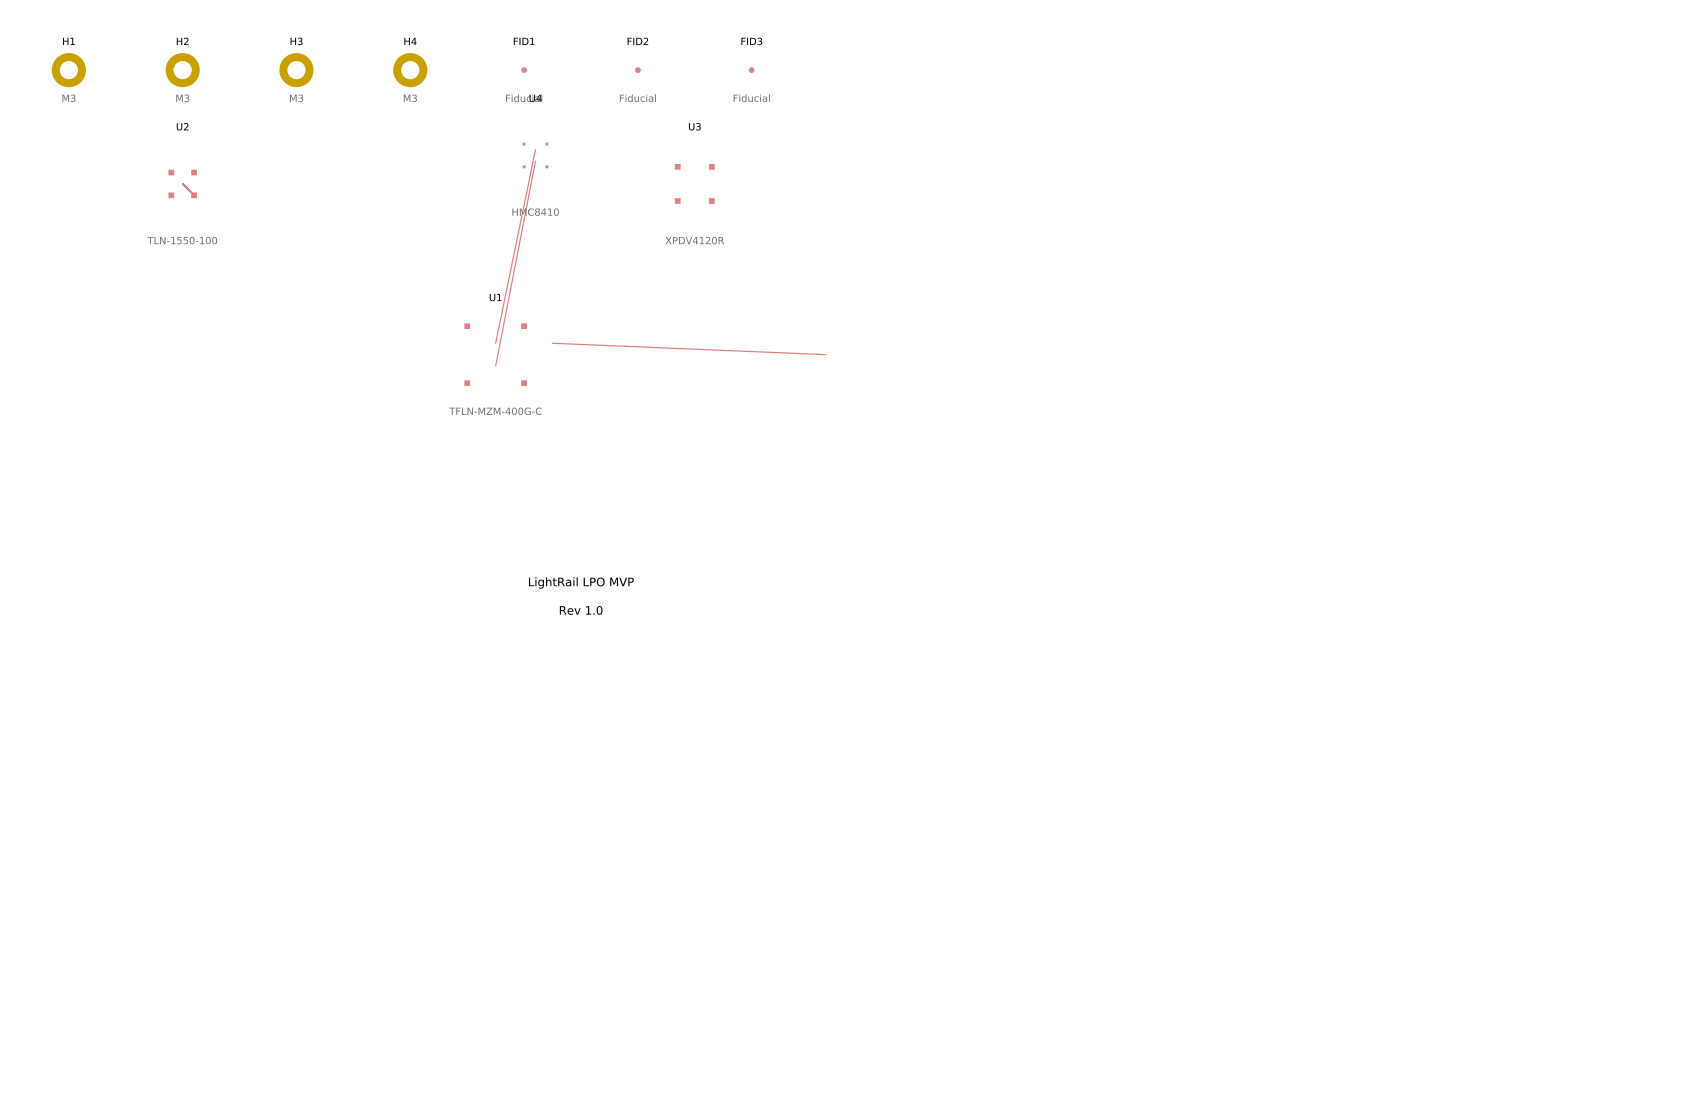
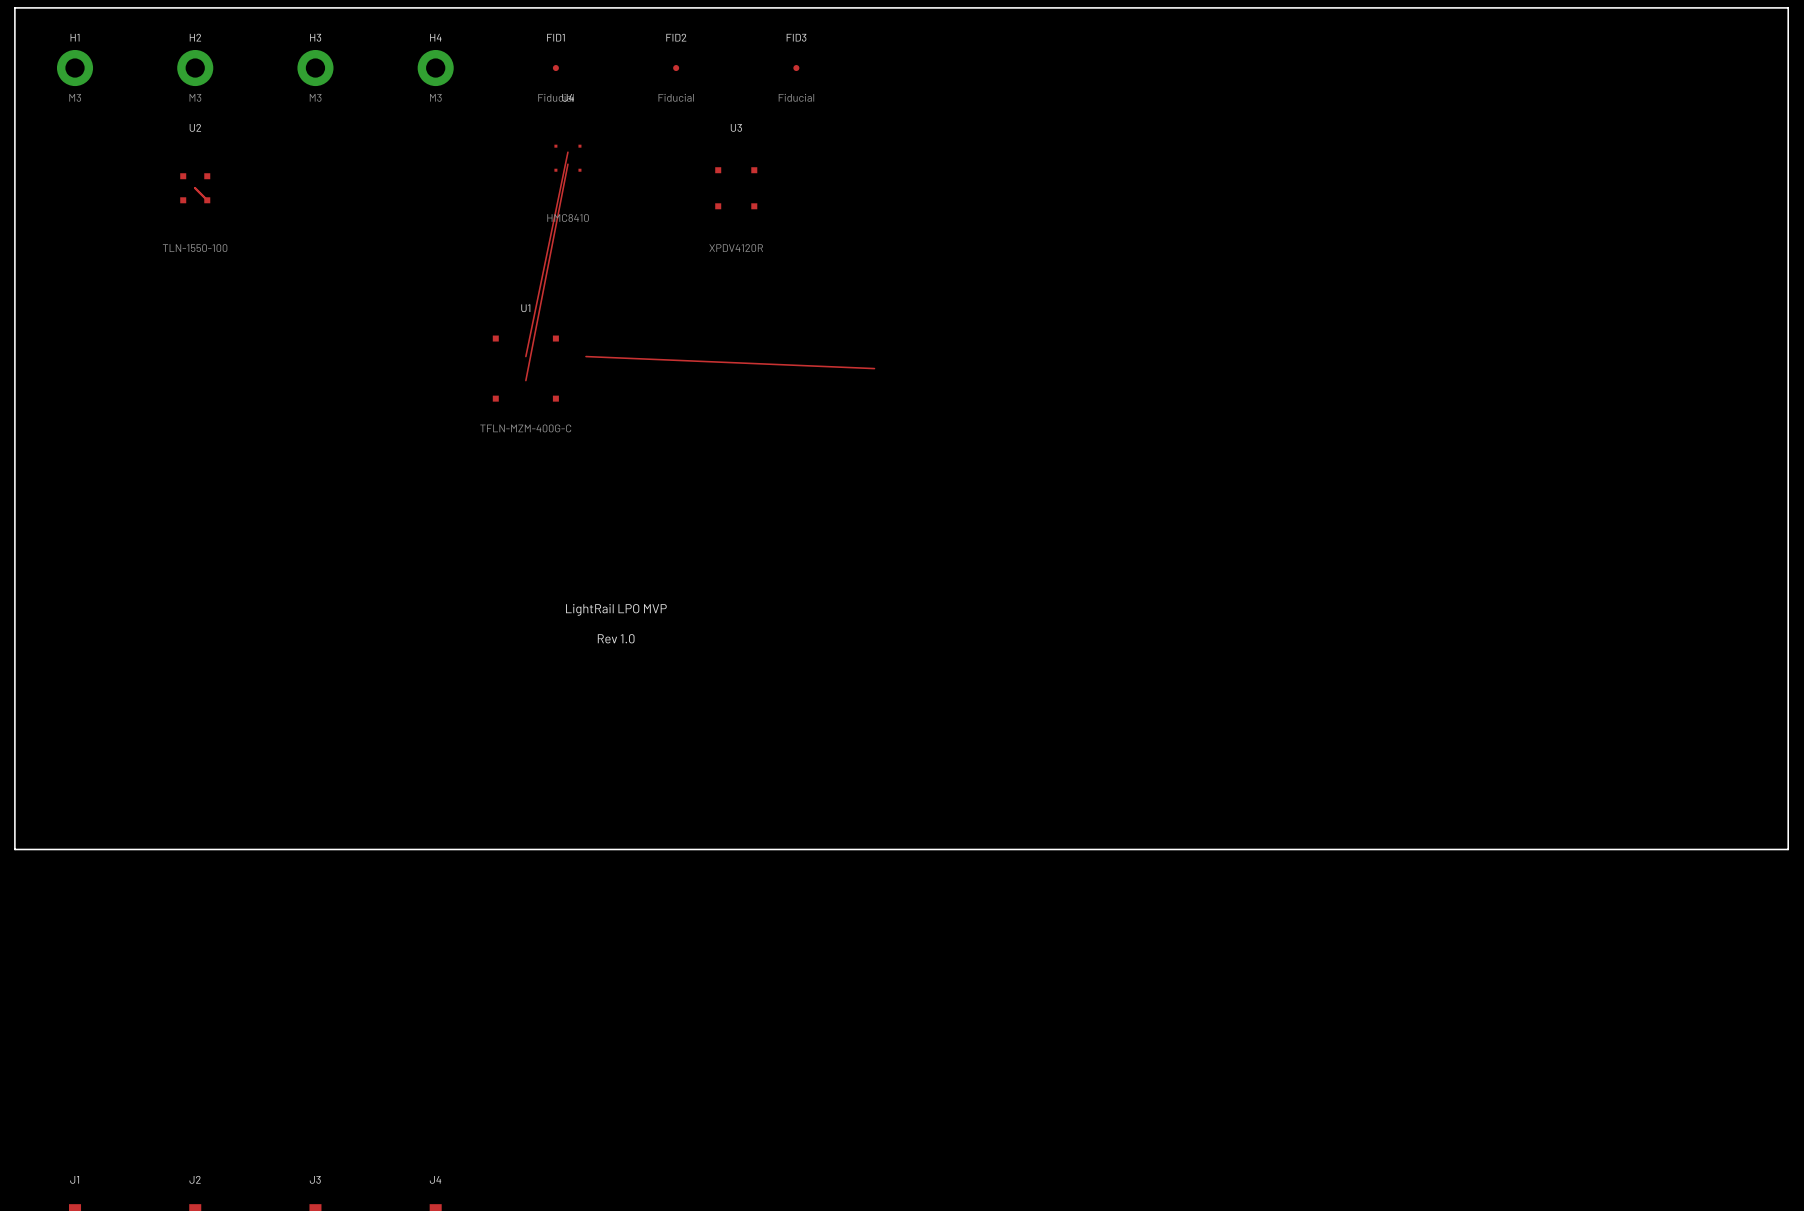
board edge: none -> (14, 7) (1788, 7) (1788, 849) (14, 849) (14, 7)

